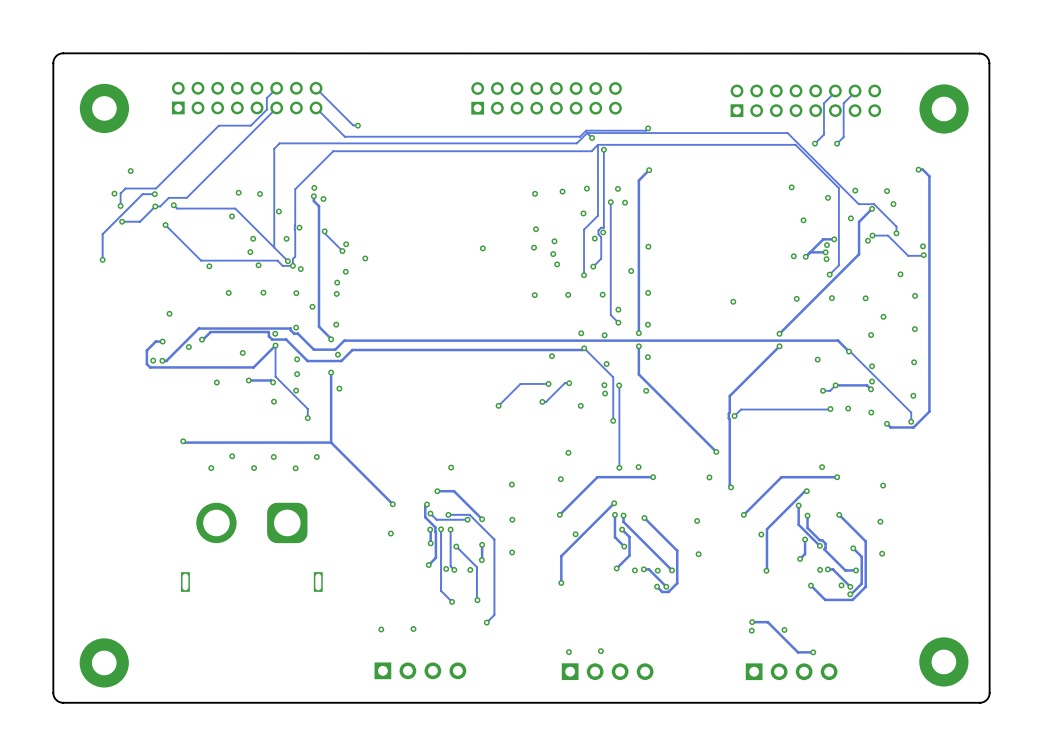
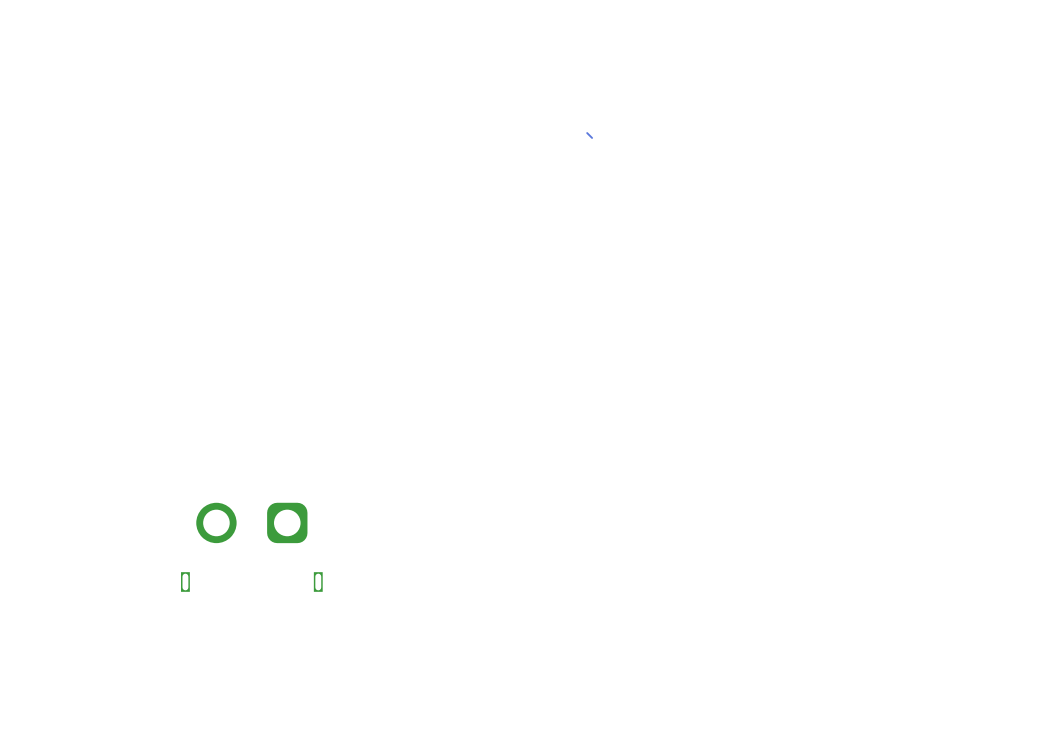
board edge: (63, 53) (984, 55) (989, 63) (988, 698) (979, 702) (57, 701) (53, 692) (53, 63) (56, 56) (63, 53) -> none
track: (276, 88) (266, 98) (266, 109) (250, 125) (218, 125) (156, 188) (125, 188) (120, 193) (120, 205) -> none
track: (316, 88) (353, 125) (357, 125) -> none
track: (835, 91) (823, 103) (823, 134) (814, 143) -> none
track: (855, 91) (843, 103) (843, 137) (837, 143) -> none
part: (247, 98) -> none
part: (546, 98) -> none
part: (805, 100) -> none
track: (276, 107) (186, 197) (168, 197) (160, 206) (155, 206) (140, 221) (122, 221) -> none
track: (316, 107) (344, 136) (580, 136) (586, 130) (645, 130) (648, 128) -> none
part: (104, 108) -> none
part: (944, 109) -> none
via: (357, 125) -> none
via: (648, 128) -> none
via: (592, 137) -> none
via: (814, 143) -> none
via: (837, 143) -> none
track: (597, 144) (591, 151) (333, 151) (295, 189) (295, 256) (292, 258) (292, 265) (282, 265) (277, 260) (201, 260) (165, 225) -> none
track: (597, 144) (795, 144) (838, 188) (838, 265) (829, 274) -> none
track: (597, 144) (597, 215) (584, 229) (584, 275) -> none
track: (603, 149) (603, 227) (598, 230) (601, 237) (601, 258) (593, 266) -> none
via: (603, 149) -> none
track: (918, 169) (922, 169) (929, 176) (929, 411) (913, 427) (890, 427) (886, 423) -> none
via: (918, 169) -> none
track: (649, 170) (638, 180) (638, 333) -> none
via: (649, 170) -> none
via: (130, 171) -> none
via: (314, 187) -> none
via: (791, 187) -> none
via: (586, 188) -> none
via: (617, 188) -> none
via: (855, 190) -> none
via: (562, 191) -> none
via: (887, 191) -> none
via: (238, 192) -> none
via: (114, 193) -> none
via: (260, 193) -> none
via: (535, 193) -> none
track: (154, 194) (142, 194) (102, 234) (102, 259) -> none
via: (154, 194) -> none
track: (313, 196) (313, 201) (318, 206) (318, 326) (331, 339) -> none
via: (313, 196) -> none
via: (828, 197) -> none
via: (323, 198) -> none
track: (610, 202) (610, 315) (618, 322) -> none
via: (610, 202) -> none
via: (625, 202) -> none
via: (893, 204) -> none
via: (120, 205) -> none
track: (173, 205) (177, 208) (235, 208) (287, 261) -> none
via: (173, 205) -> none
via: (155, 206) -> none
track: (872, 208) (859, 221) (859, 254) (779, 333) -> none
via: (872, 208) -> none
via: (278, 211) -> none
via: (583, 213) -> none
via: (232, 216) -> none
via: (850, 218) -> none
via: (803, 220) -> none
via: (122, 221) -> none
via: (165, 225) -> none
via: (299, 227) -> none
via: (536, 229) -> none
track: (324, 231) (342, 251) -> none
via: (324, 231) -> none
via: (603, 232) -> none
track: (896, 233) (896, 226) (874, 204) (858, 204) (787, 133) (587, 133) (576, 143) (279, 143) (274, 148) (274, 247) -> none
via: (896, 233) -> none
track: (872, 235) (887, 235) (908, 255) (923, 255) -> none
via: (872, 235) -> none
via: (253, 238) -> none
via: (286, 238) -> none
via: (594, 238) -> none
track: (834, 239) (823, 239) (805, 256) -> none
via: (834, 239) -> none
via: (867, 240) -> none
via: (554, 241) -> none
via: (346, 244) -> none
via: (827, 245) -> none
via: (648, 246) -> none
via: (922, 246) -> none
via: (534, 247) -> none
via: (482, 248) -> none
via: (342, 251) -> none
via: (250, 252) -> none
track: (825, 252) (810, 252) -> none
via: (825, 252) -> none
via: (553, 254) -> none
via: (923, 255) -> none
via: (793, 256) -> none
via: (805, 256) -> none
via: (365, 258) -> none
via: (102, 259) -> none
via: (826, 259) -> none
via: (287, 261) -> none
via: (557, 264) -> none
via: (258, 265) -> none
via: (292, 265) -> none
via: (209, 266) -> none
via: (593, 266) -> none
via: (300, 269) -> none
via: (345, 271) -> none
via: (631, 271) -> none
via: (829, 274) -> none
via: (900, 274) -> none
via: (584, 275) -> none
via: (337, 282) -> none
via: (228, 292) -> none
via: (263, 292) -> none
via: (648, 292) -> none
via: (296, 293) -> none
via: (336, 293) -> none
via: (568, 294) -> none
via: (602, 294) -> none
via: (534, 295) -> none
via: (915, 295) -> none
via: (796, 298) -> none
via: (831, 298) -> none
via: (865, 298) -> none
via: (733, 301) -> none
via: (312, 306) -> none
via: (618, 309) -> none
via: (169, 313) -> none
via: (883, 316) -> none
via: (618, 322) -> none
via: (336, 324) -> none
via: (647, 324) -> none
via: (296, 327) -> none
via: (914, 329) -> none
via: (275, 333) -> none
via: (581, 333) -> none
via: (638, 333) -> none
via: (779, 333) -> none
via: (604, 335) -> none
via: (871, 335) -> none
track: (201, 339) (210, 332) (268, 332) (268, 336) (272, 339) (286, 339) (307, 361) (341, 361) (352, 350) (582, 350) (584, 348) (613, 377) (613, 420) -> none
via: (201, 339) -> none
via: (331, 339) -> none
track: (162, 341) (155, 341) (146, 350) (146, 364) (150, 367) (253, 367) (275, 345) (275, 376) (307, 408) (307, 418) -> none
via: (162, 341) -> none
via: (275, 345) -> none
track: (638, 346) (638, 374) (716, 451) -> none
via: (638, 346) -> none
track: (779, 346) (729, 396) (731, 487) -> none
via: (779, 346) -> none
via: (188, 347) -> none
via: (584, 348) -> none
via: (849, 351) -> none
via: (242, 352) -> none
via: (337, 354) -> none
via: (551, 356) -> none
via: (647, 357) -> none
via: (297, 359) -> none
via: (817, 359) -> none
via: (153, 360) -> none
track: (162, 360) (166, 361) (198, 328) (290, 328) (313, 349) (335, 349) (344, 340) (838, 340) (911, 412) (911, 421) -> none
via: (162, 360) -> none
via: (914, 362) -> none
via: (606, 364) -> none
via: (872, 366) -> none
track: (331, 372) (331, 442) -> none
via: (331, 372) -> none
via: (297, 374) -> none
track: (248, 380) (271, 380) (273, 382) -> none
via: (248, 380) -> none
via: (872, 381) -> none
via: (216, 382) -> none
via: (273, 382) -> none
track: (548, 383) (520, 383) (498, 405) -> none
via: (548, 383) -> none
track: (569, 383) (564, 383) (546, 401) (542, 401) -> none
via: (569, 383) -> none
via: (604, 385) -> none
track: (619, 385) (619, 467) -> none
via: (619, 385) -> none
via: (835, 385) -> none
via: (339, 388) -> none
track: (870, 389) (867, 385) (835, 385) (830, 390) (823, 390) -> none
via: (870, 389) -> none
via: (296, 390) -> none
via: (646, 390) -> none
via: (823, 390) -> none
via: (605, 393) -> none
via: (913, 395) -> none
via: (274, 401) -> none
via: (542, 401) -> none
via: (498, 405) -> none
via: (580, 405) -> none
via: (848, 408) -> none
track: (830, 409) (741, 409) (734, 416) -> none
via: (830, 409) -> none
via: (871, 412) -> none
via: (734, 416) -> none
via: (307, 418) -> none
via: (613, 420) -> none
via: (911, 421) -> none
via: (886, 423) -> none
track: (183, 441) (331, 442) -> none
via: (183, 441) -> none
track: (331, 442) (392, 504) -> none
via: (716, 451) -> none
via: (568, 452) -> none
via: (232, 456) -> none
via: (273, 457) -> none
via: (316, 457) -> none
via: (451, 467) -> none
via: (619, 467) -> none
via: (638, 467) -> none
via: (822, 467) -> none
via: (211, 468) -> none
via: (254, 468) -> none
via: (295, 468) -> none
track: (653, 477) (597, 477) (559, 514) -> none
via: (653, 477) -> none
via: (709, 477) -> none
track: (837, 477) (781, 477) (743, 514) -> none
via: (837, 477) -> none
via: (560, 479) -> none
via: (511, 484) -> none
via: (883, 485) -> none
via: (731, 487) -> none
track: (437, 491) (454, 491) (482, 519) -> none
via: (437, 491) -> none
track: (806, 491) (766, 529) (766, 570) -> none
via: (806, 491) -> none
track: (614, 503) (561, 556) (561, 582) -> none
via: (614, 503) -> none
via: (392, 504) -> none
track: (427, 504) (425, 517) (435, 527) (435, 532) (435, 557) (428, 565) -> none
via: (427, 504) -> none
track: (798, 505) (798, 524) (819, 545) -> none
via: (798, 505) -> none
track: (430, 513) (436, 519) (467, 519) -> none
via: (430, 513) -> none
track: (448, 514) (469, 514) (494, 539) (494, 614) (486, 622) -> none
via: (448, 514) -> none
via: (559, 514) -> none
track: (614, 514) (614, 537) (624, 546) -> none
via: (614, 514) -> none
via: (743, 514) -> none
track: (839, 514) (865, 541) (865, 586) (852, 599) (825, 599) (810, 585) -> none
via: (839, 514) -> none
track: (623, 515) (623, 521) (672, 570) -> none
via: (623, 515) -> none
track: (807, 515) (807, 527) (825, 543) (824, 549) (845, 570) (856, 570) -> none
via: (807, 515) -> none
track: (644, 518) (677, 550) (677, 583) (668, 591) (662, 591) (657, 586) -> none
via: (644, 518) -> none
via: (467, 519) -> none
via: (482, 519) -> none
via: (512, 519) -> none
via: (697, 520) -> none
via: (880, 521) -> none
track: (430, 529) (430, 543) -> none
via: (430, 529) -> none
track: (441, 529) (441, 590) (452, 601) -> none
via: (441, 529) -> none
track: (450, 529) (450, 566) (454, 569) -> none
via: (450, 529) -> none
track: (622, 529) (629, 537) (629, 555) (616, 568) -> none
via: (622, 529) -> none
via: (390, 533) -> none
via: (575, 534) -> none
via: (761, 534) -> none
track: (805, 539) (805, 554) (800, 558) -> none
via: (805, 539) -> none
via: (430, 543) -> none
track: (482, 544) (481, 560) -> none
via: (482, 544) -> none
via: (819, 545) -> none
track: (456, 546) (476, 567) (477, 600) -> none
via: (456, 546) -> none
via: (624, 546) -> none
track: (853, 548) (861, 556) (861, 583) (850, 594) -> none
via: (853, 548) -> none
via: (512, 552) -> none
via: (882, 553) -> none
via: (698, 554) -> none
via: (800, 558) -> none
via: (481, 560) -> none
via: (428, 565) -> none
via: (446, 568) -> none
via: (616, 568) -> none
via: (454, 569) -> none
via: (470, 569) -> none
track: (643, 569) (648, 569) (666, 586) -> none
via: (643, 569) -> none
via: (820, 569) -> none
track: (827, 569) (832, 569) (850, 586) -> none
via: (827, 569) -> none
via: (634, 570) -> none
via: (657, 570) -> none
via: (672, 570) -> none
via: (766, 570) -> none
via: (856, 570) -> none
via: (561, 582) -> none
via: (810, 585) -> none
via: (841, 585) -> none
via: (657, 586) -> none
via: (666, 586) -> none
via: (850, 586) -> none
via: (850, 594) -> none
via: (477, 600) -> none
via: (452, 601) -> none
via: (486, 622) -> none
track: (752, 622) (767, 622) (797, 652) (813, 652) -> none
via: (752, 622) -> none
via: (413, 628) -> none
via: (381, 629) -> none
via: (784, 629) -> none
via: (751, 630) -> none
via: (600, 651) -> none
via: (568, 652) -> none
via: (813, 652) -> none
part: (943, 661) -> none
part: (104, 662) -> none
part: (420, 670) -> none
part: (607, 671) -> none
part: (791, 671) -> none

